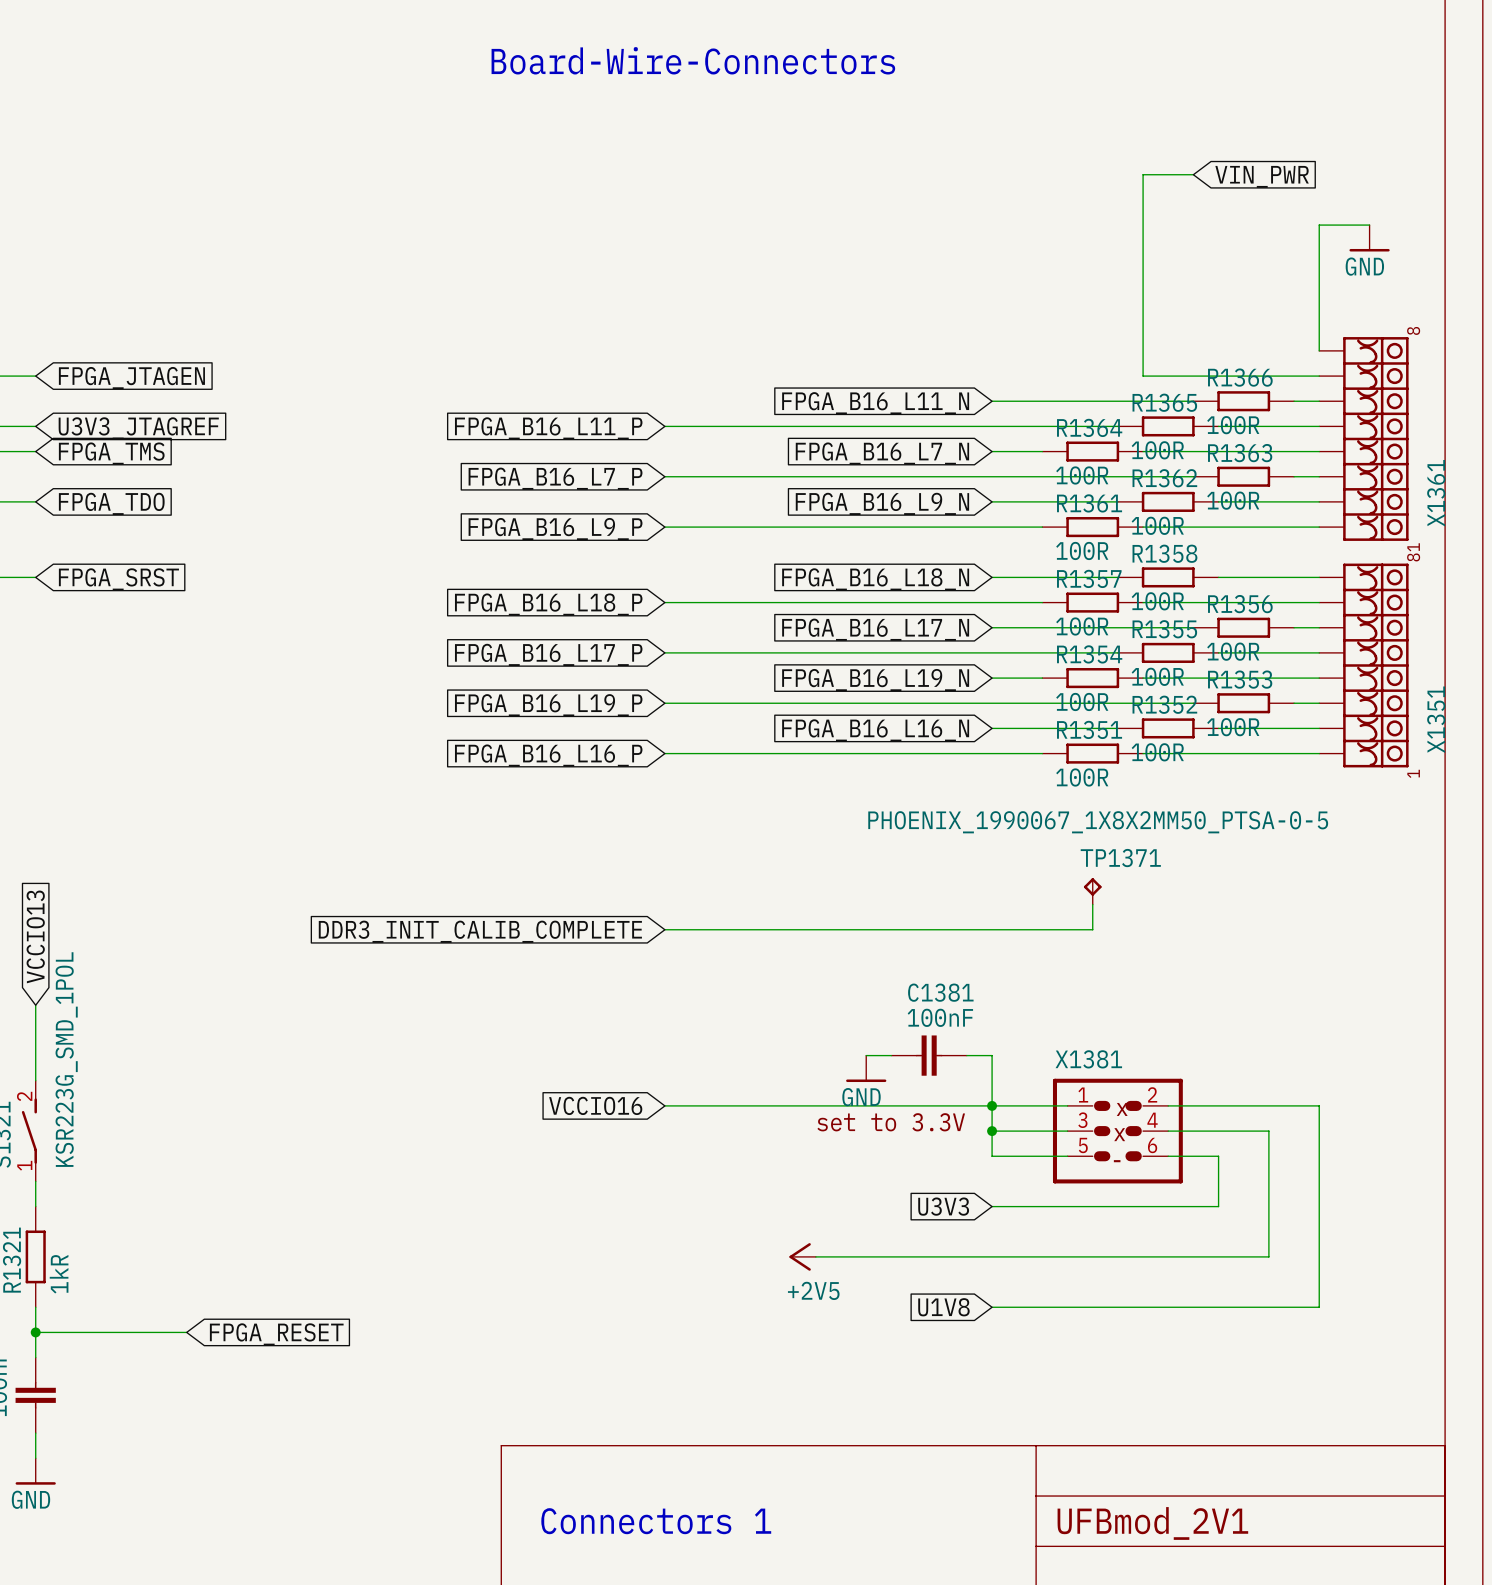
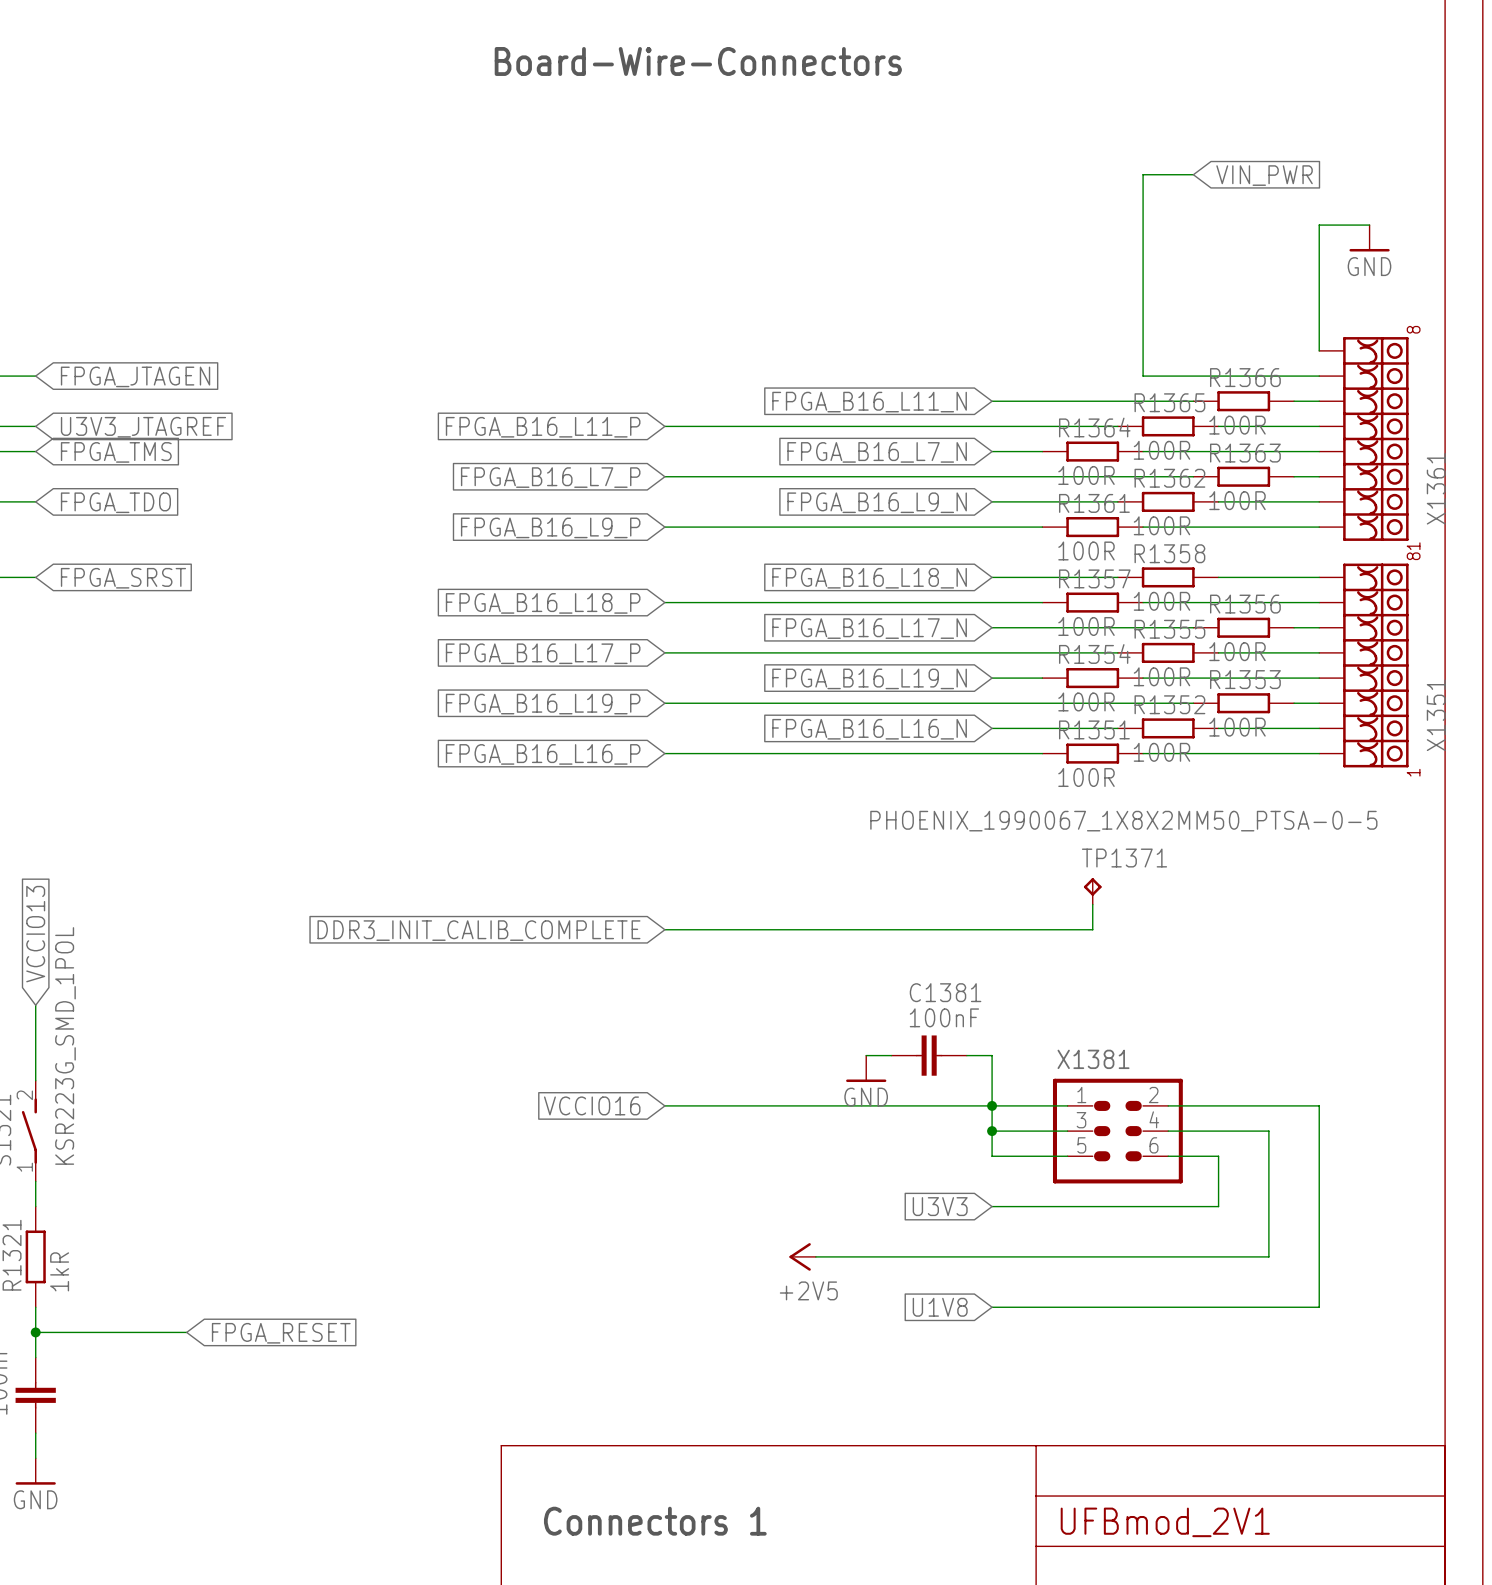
text: x (1122, 1109) -> none
text: set to 3.3V (891, 1122) -> none
text: x (1119, 1134) -> none
text: - (1117, 1161) -> none

